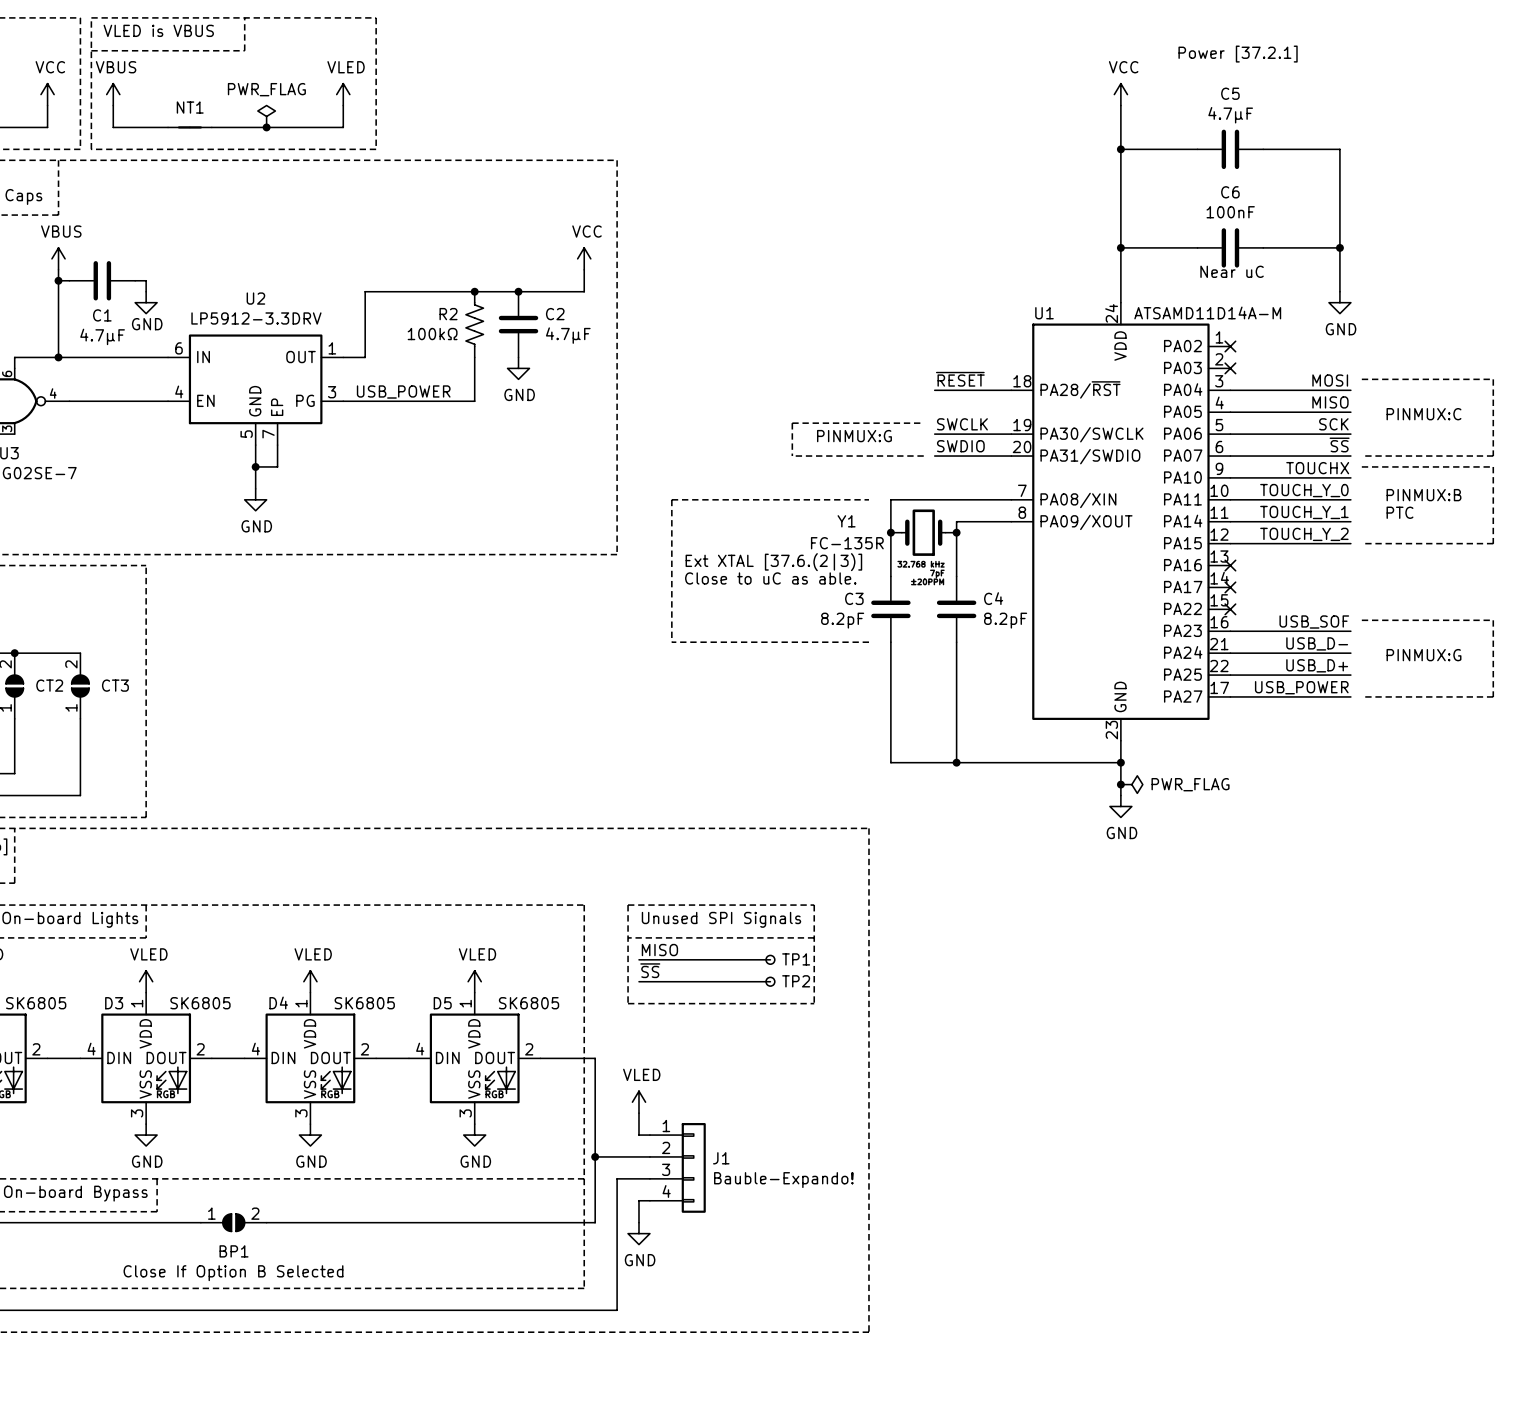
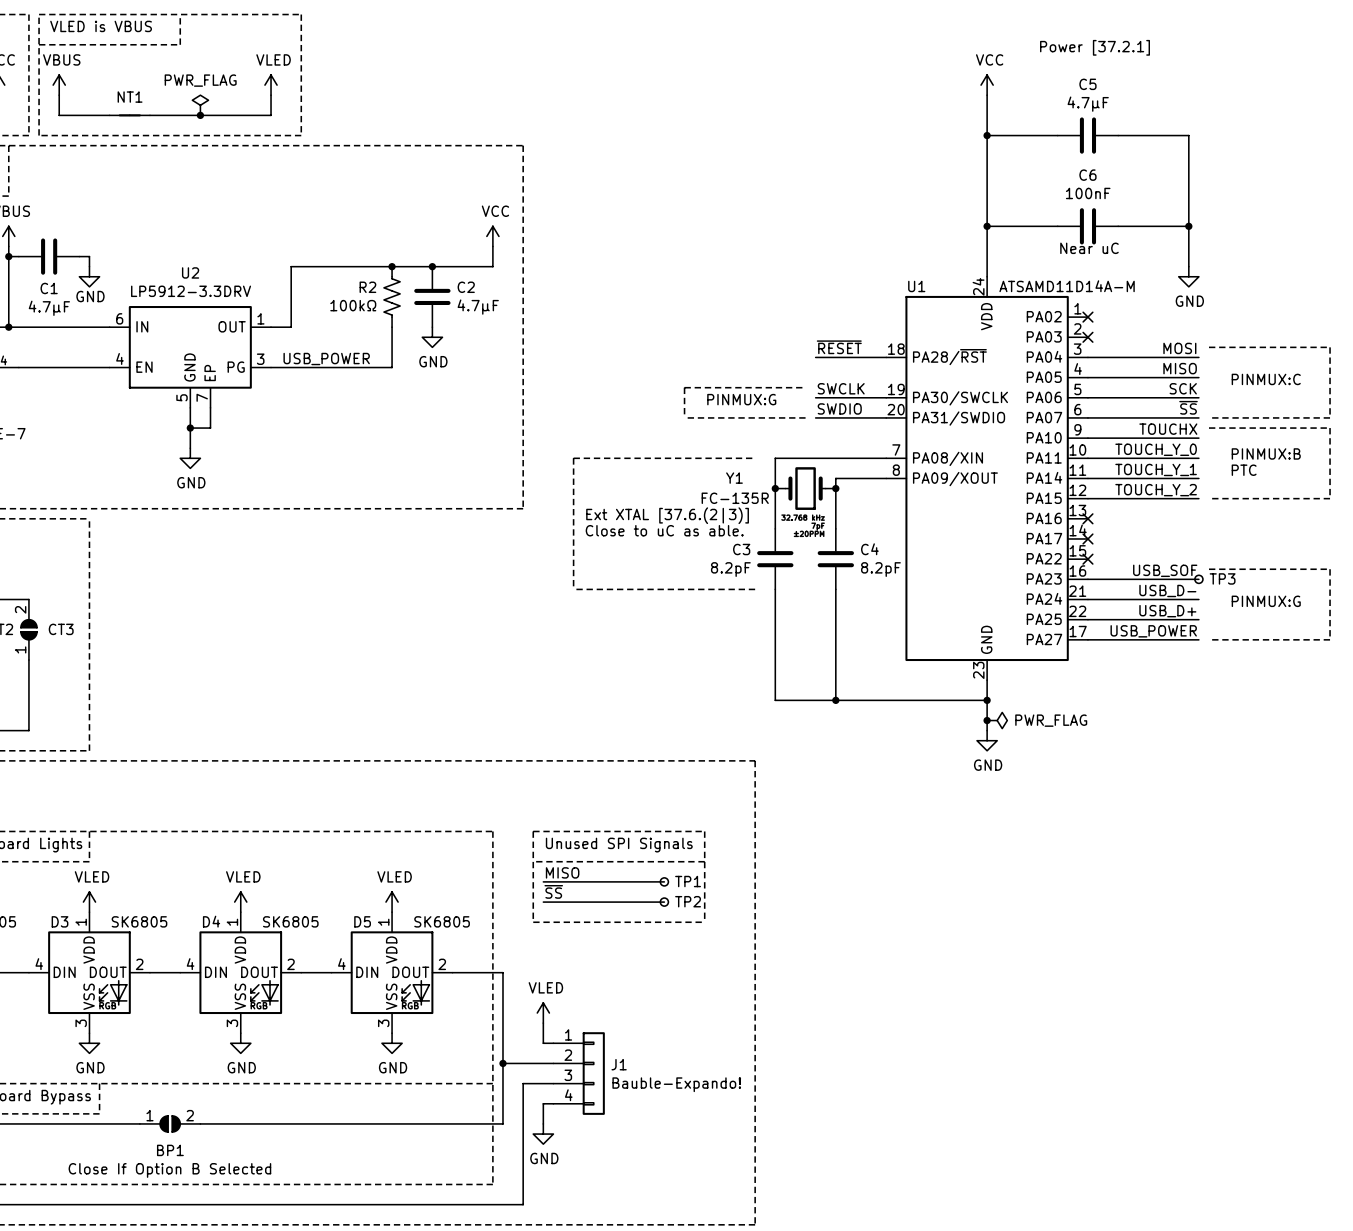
TP3: none -> (1198, 579)

